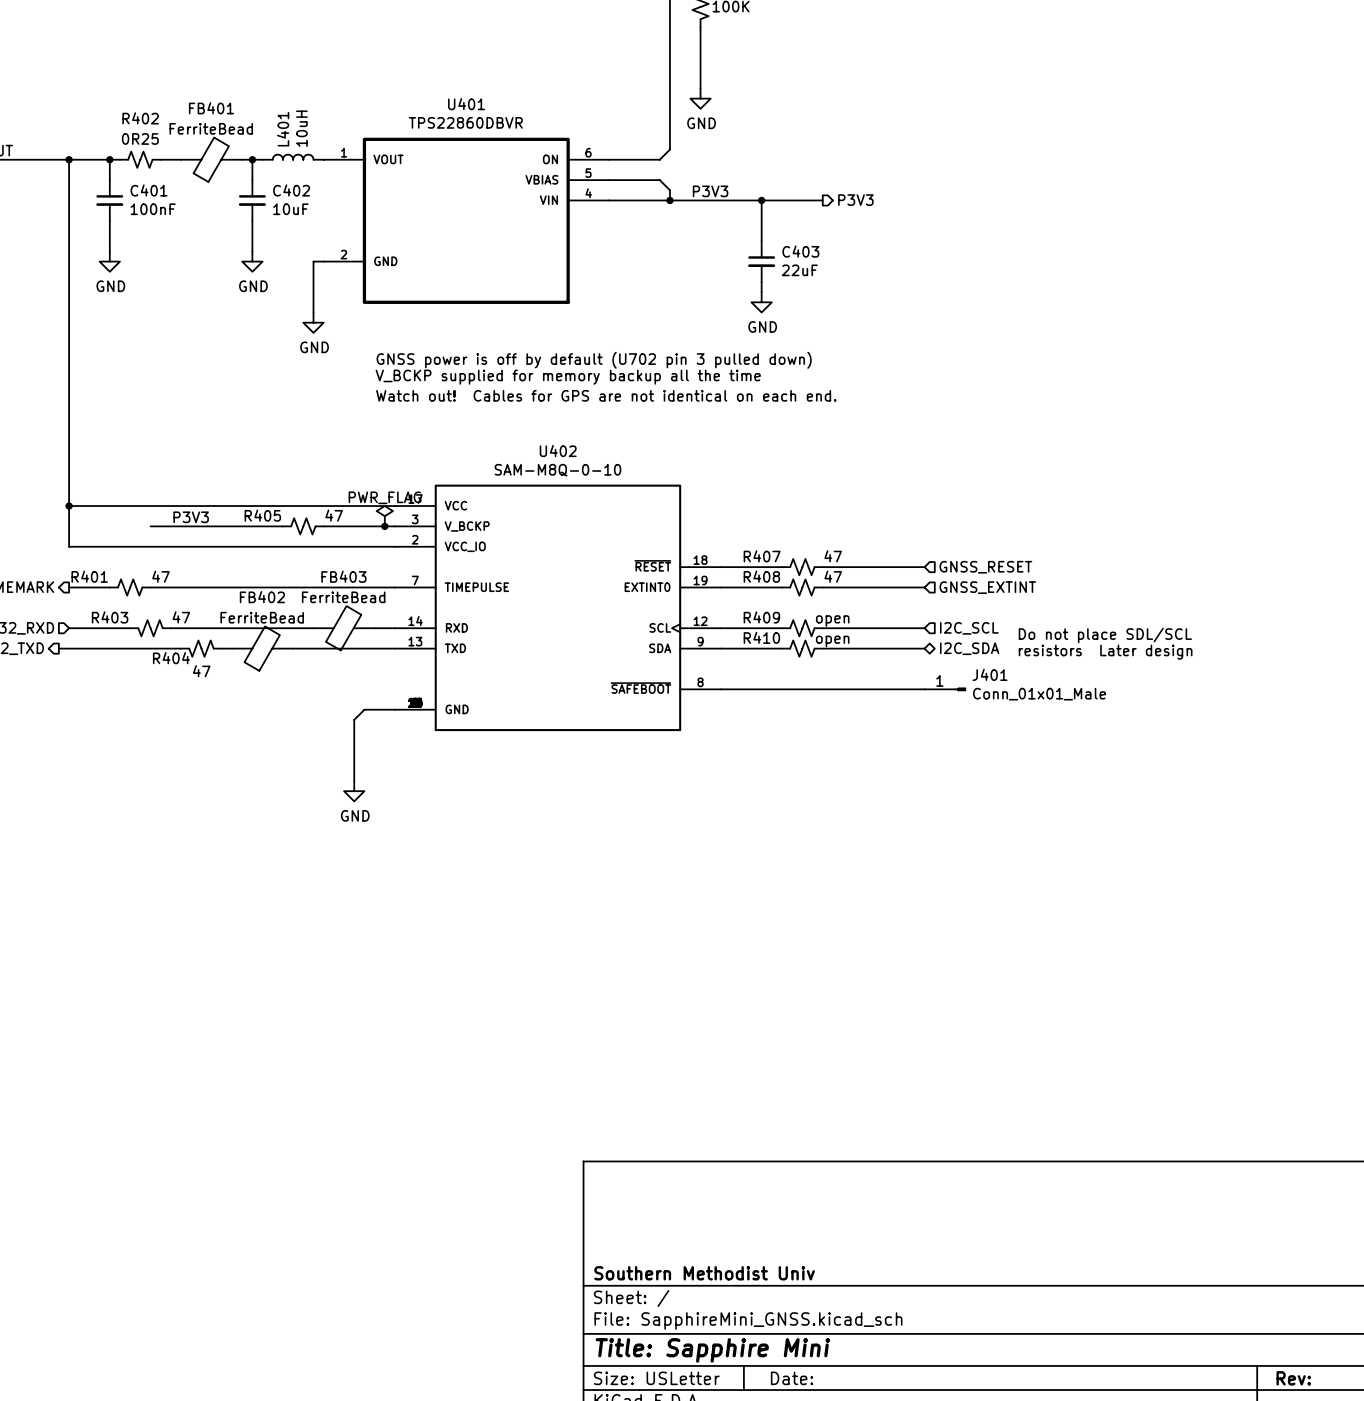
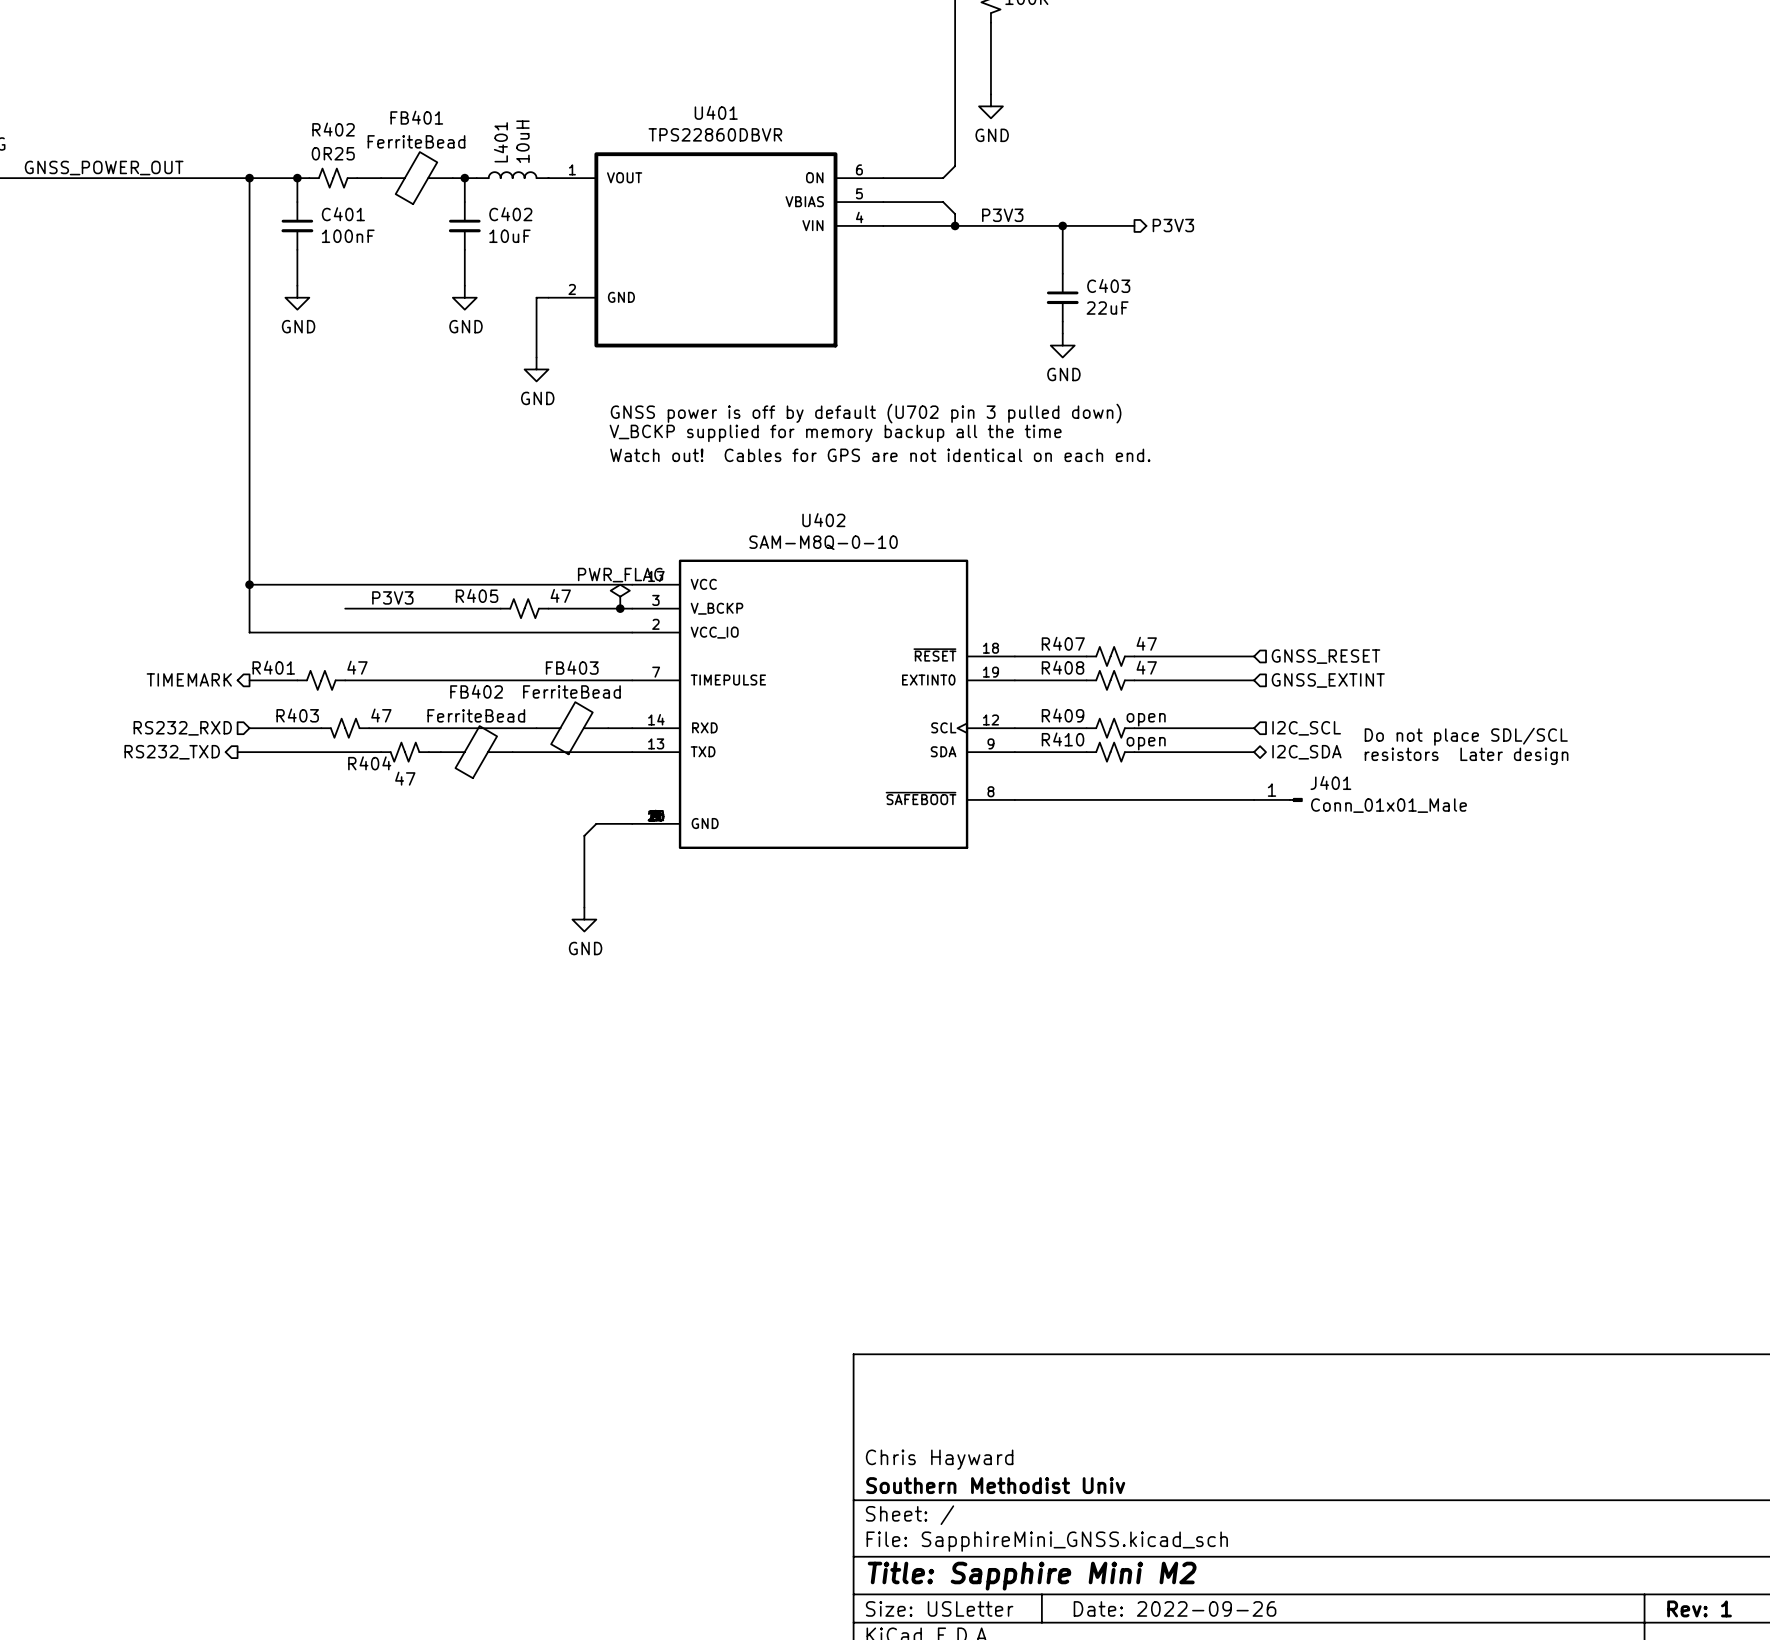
title block: none -> Chris Hayward (939, 1459)
title block: Title: Sapphire Mini (712, 1350) -> Title: Sapphire Mini M2 (1032, 1576)
title block: Date: (791, 1378) -> Date: 2022-09-26 (1175, 1608)
title block: Rev: (1293, 1378) -> Rev: 1 (1699, 1608)

